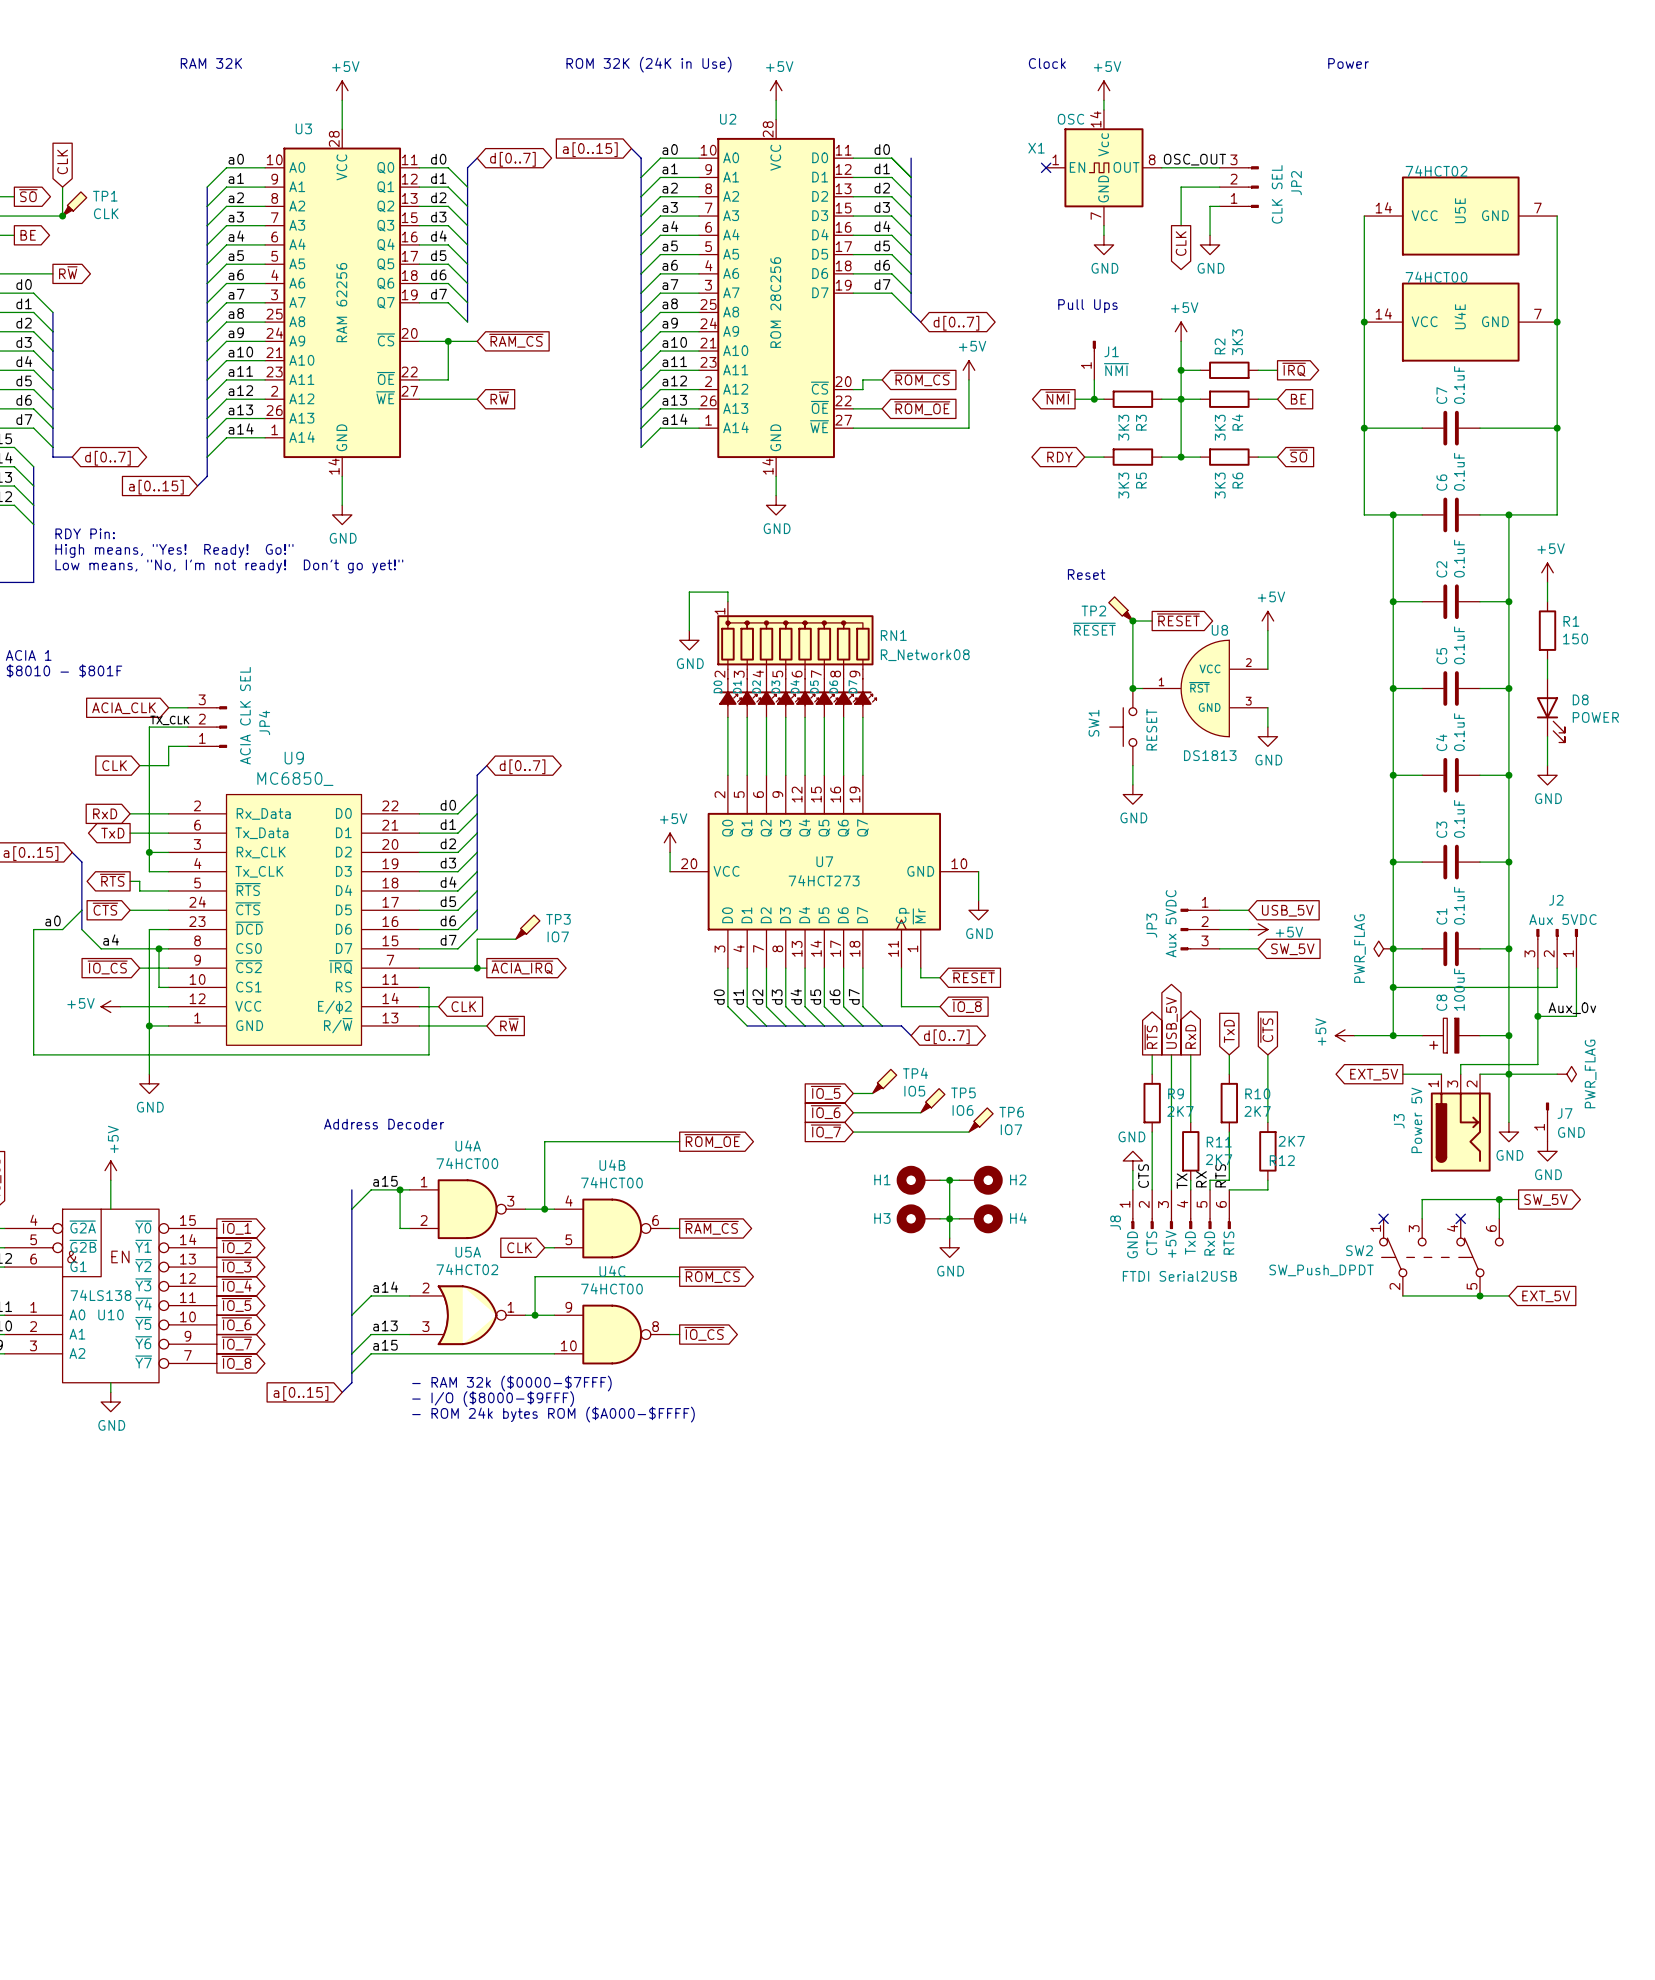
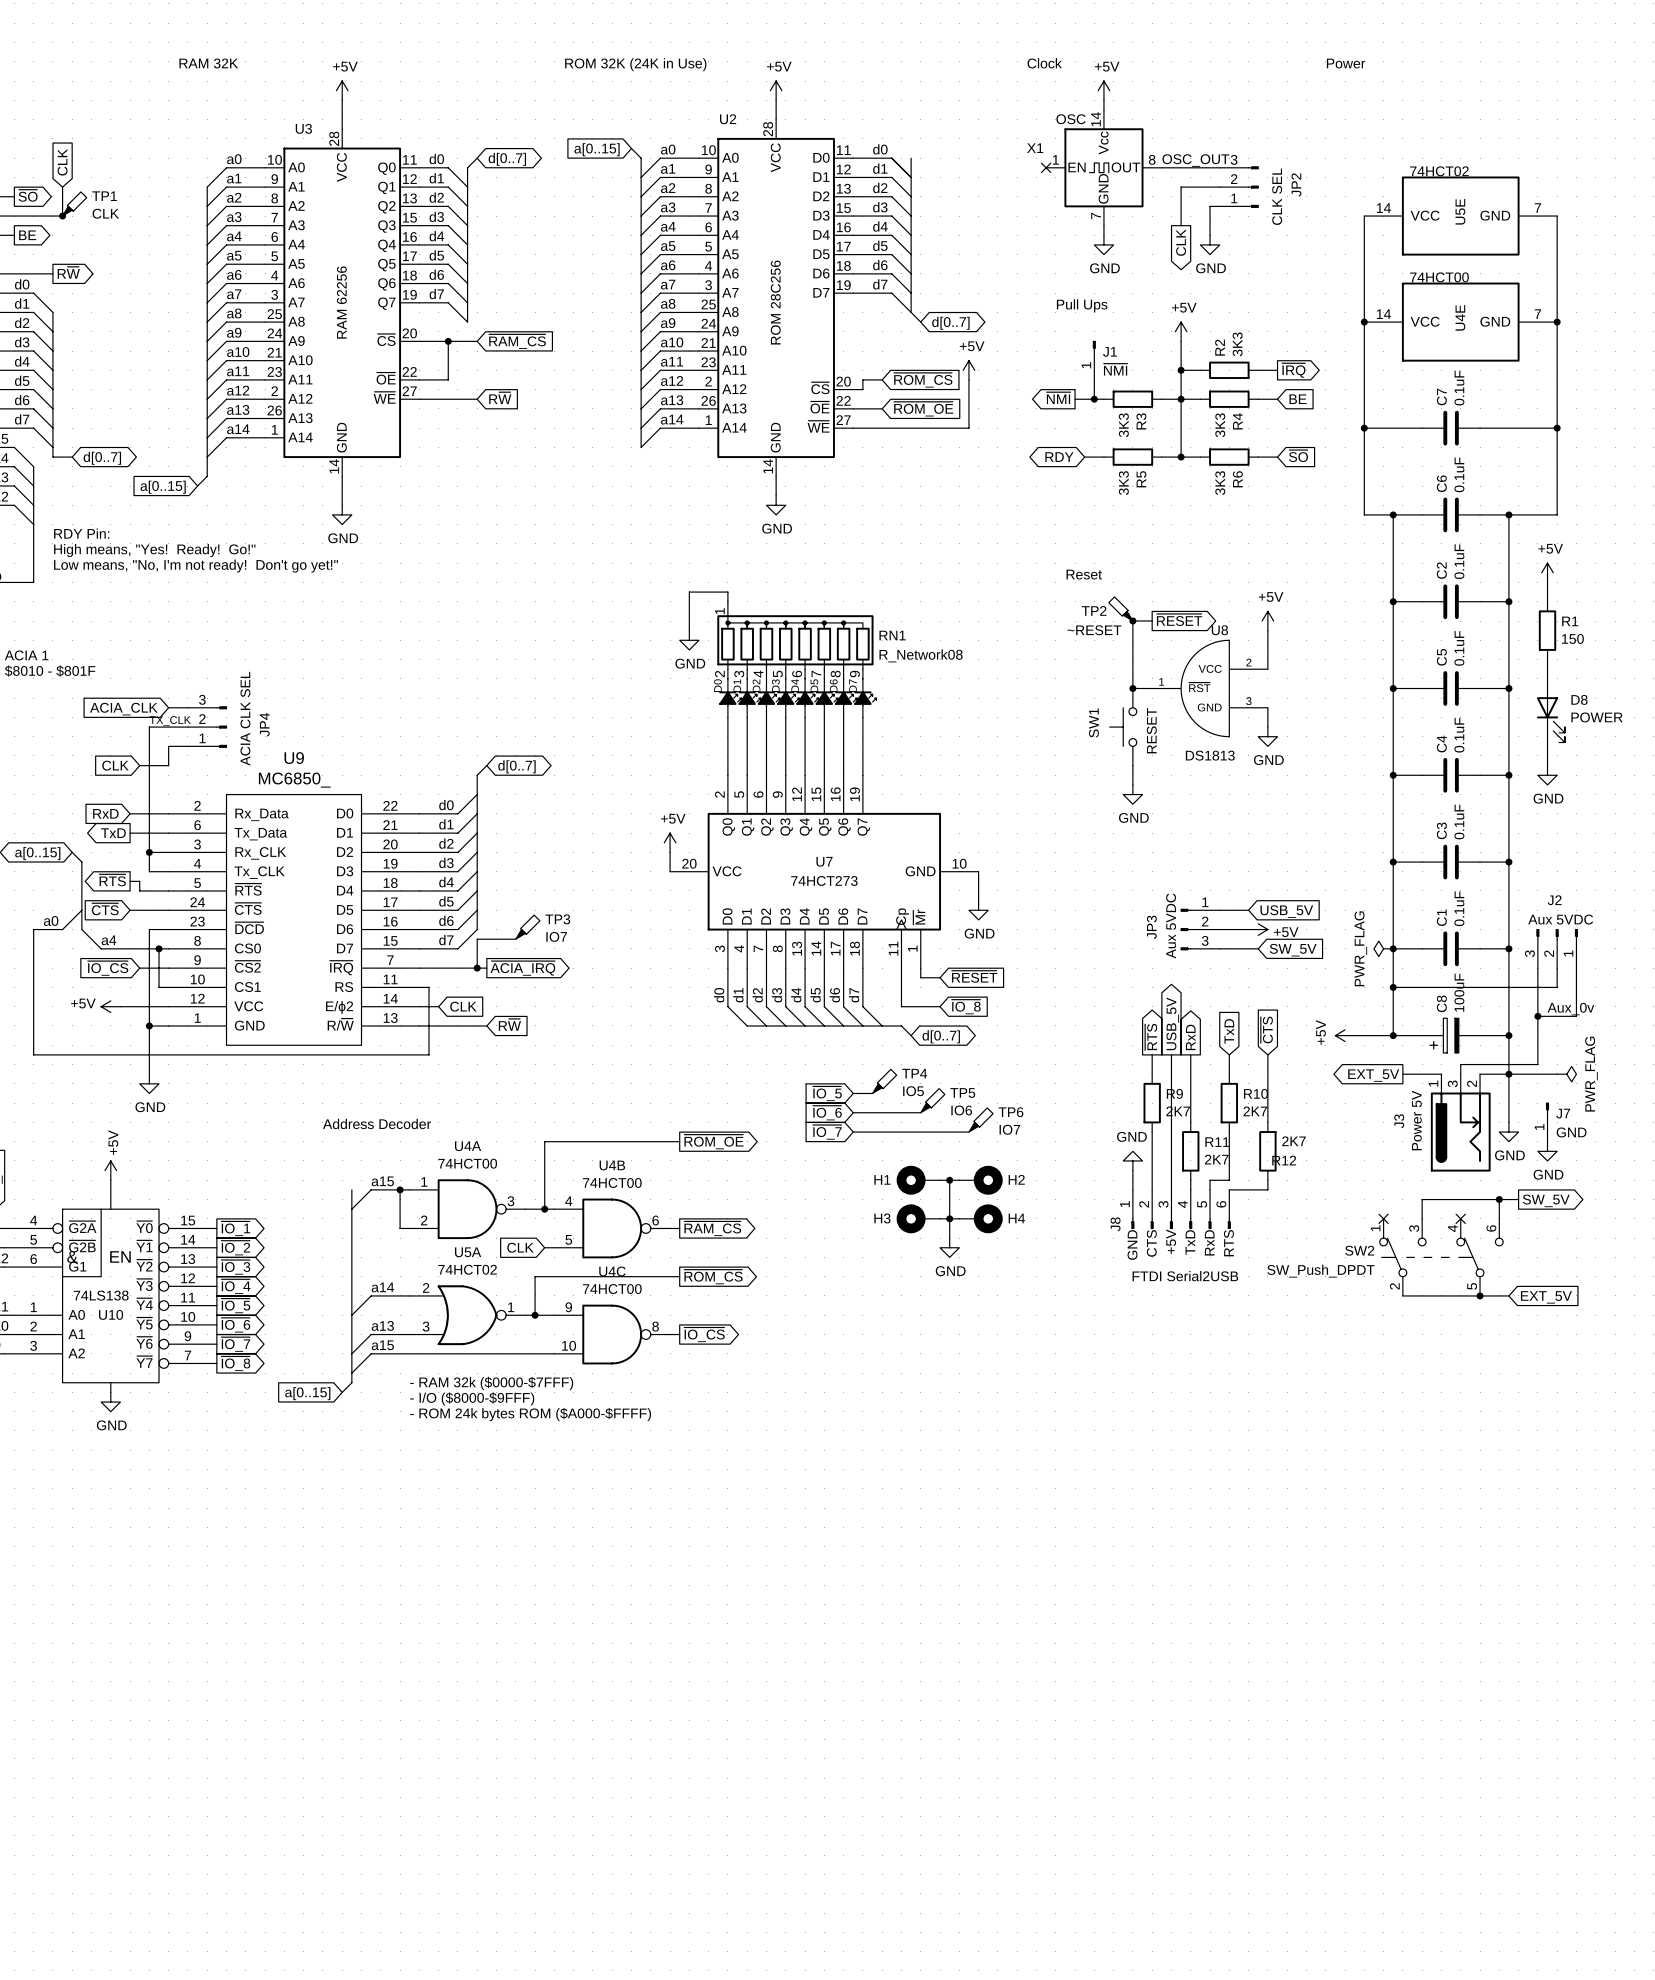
TP2 value: ~{RESET} (1094, 629) -> ~RESET (1094, 630)
label: RTS (1220, 1175) -> none
label: CTS (1143, 1176) -> none
label: RX (1201, 1179) -> none
label: TX (1182, 1181) -> none

